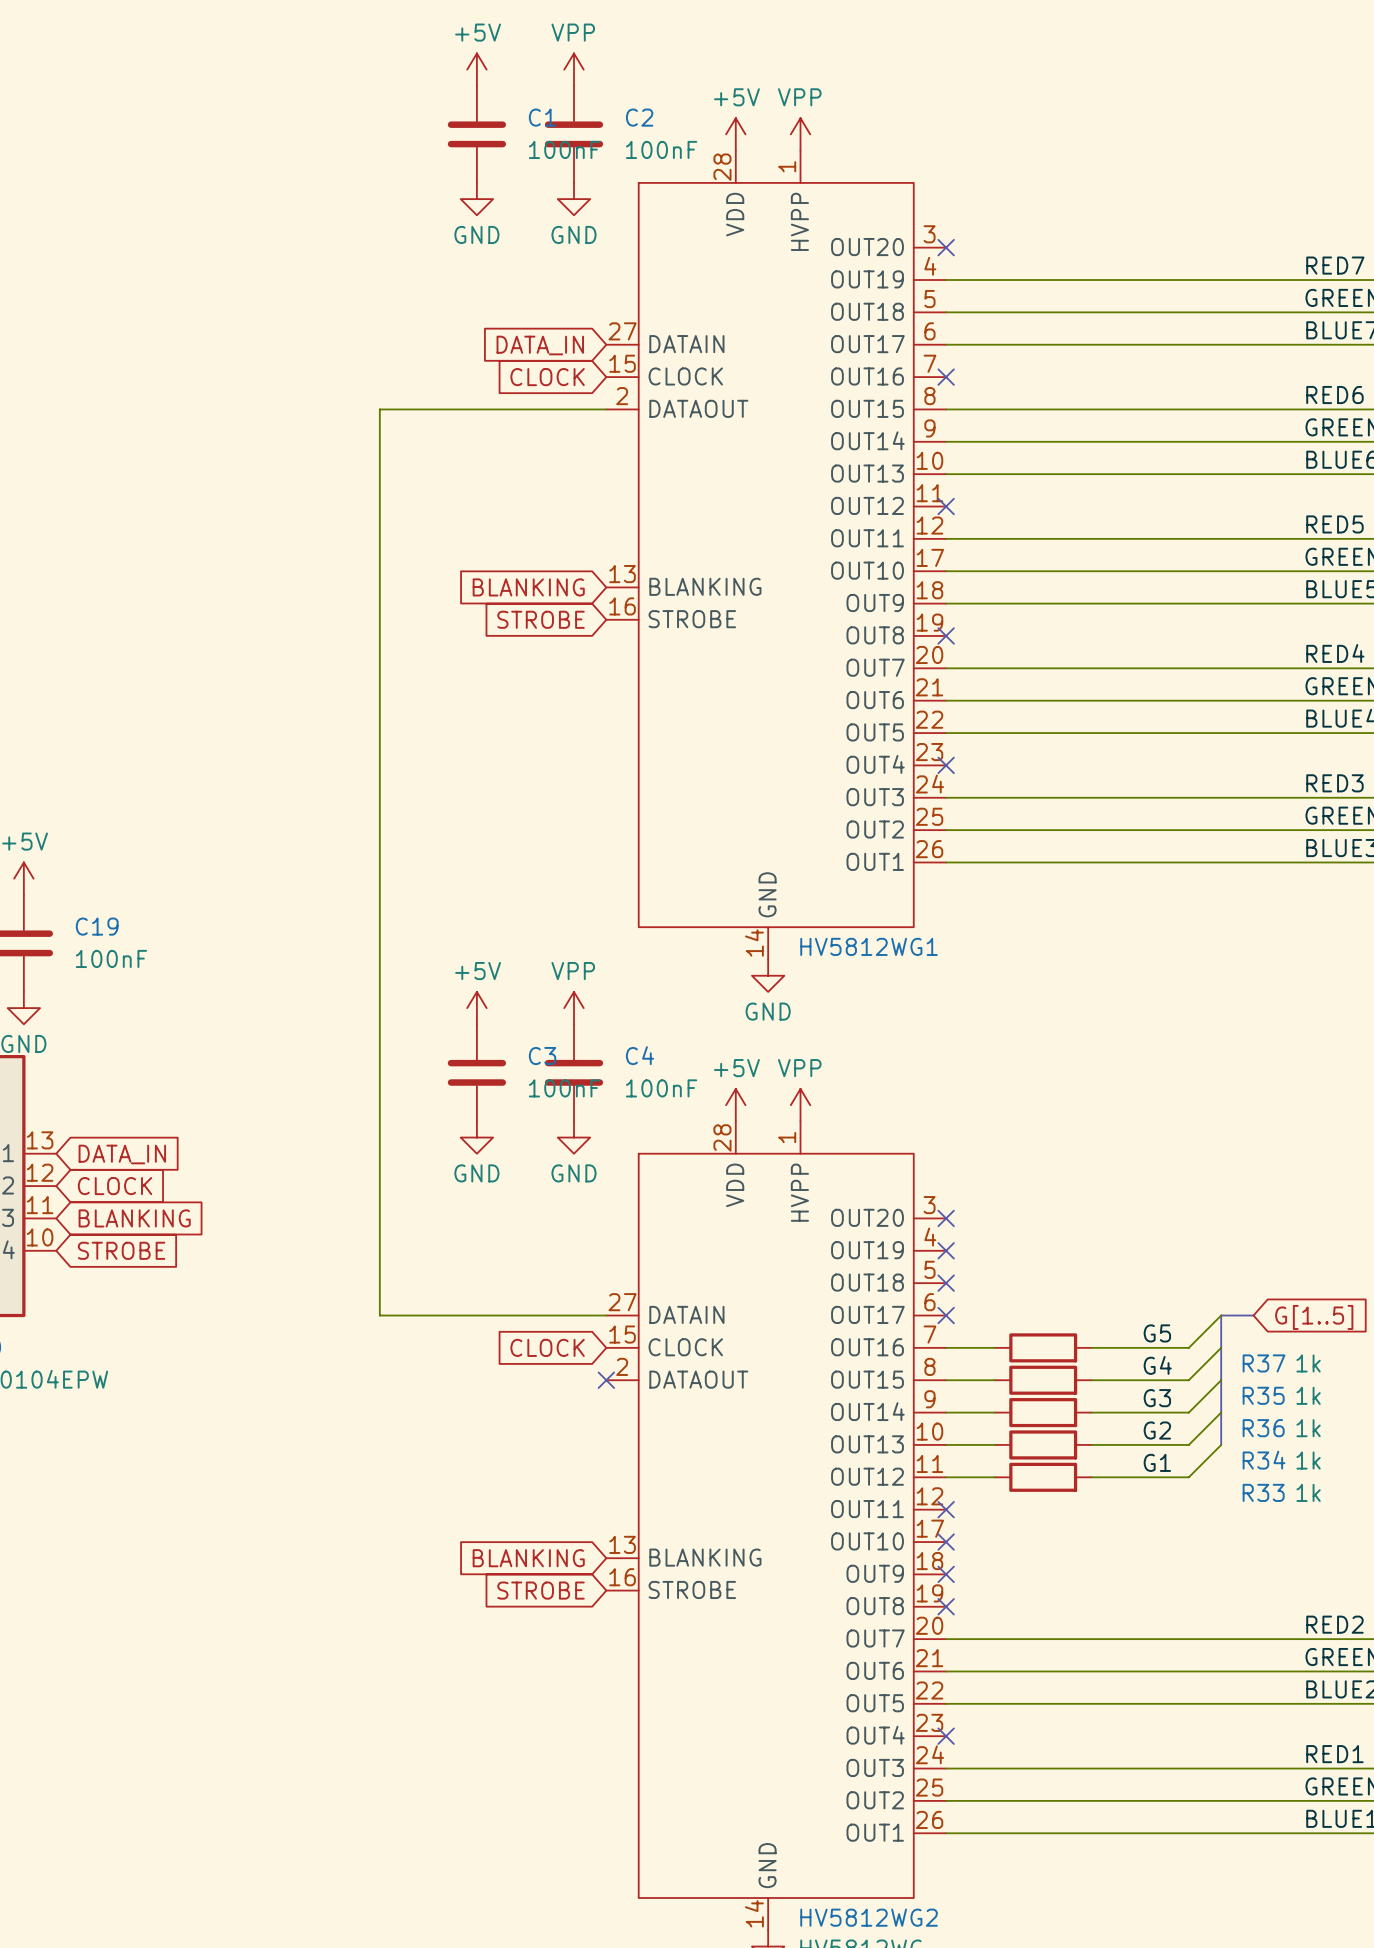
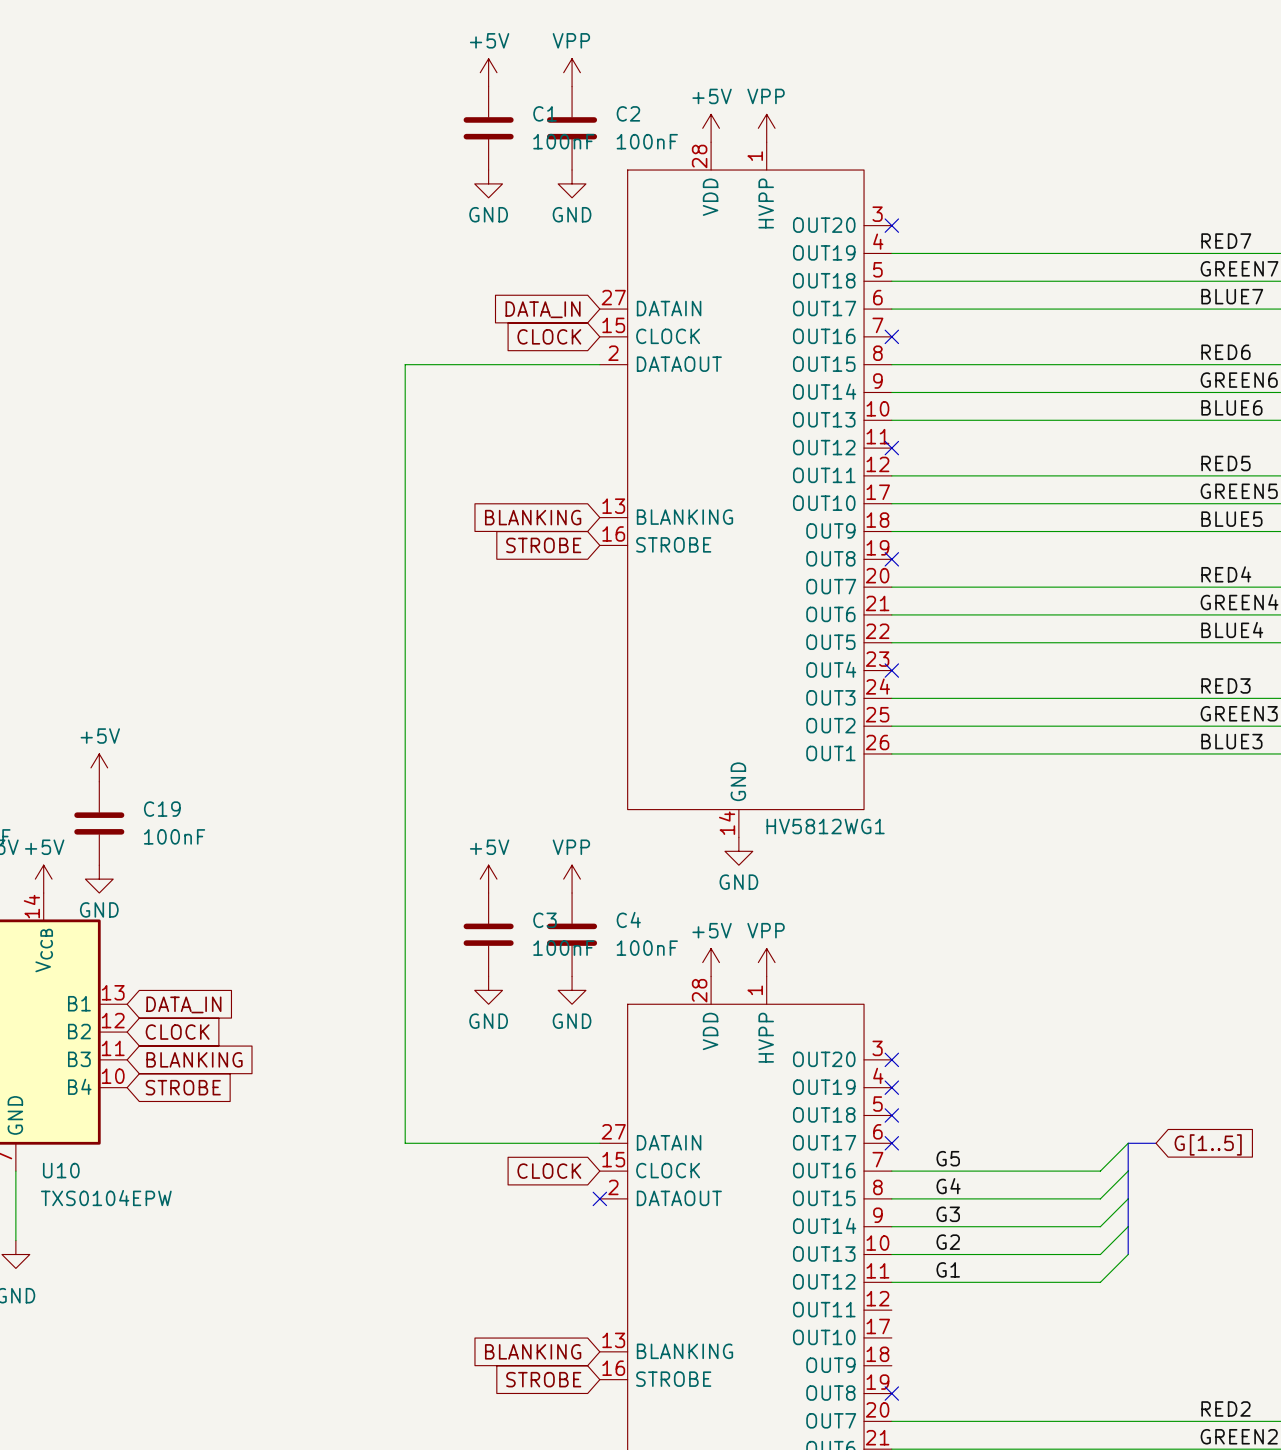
label position: G5 (1157, 1333) -> G5 (948, 1158)
wire: none -> (933, 1171) (1016, 1171)
R37: 1k (1043, 1347) -> none
label position: G4 (1157, 1365) -> G4 (948, 1186)
wire: none -> (933, 1198) (1016, 1198)
R35: 1k (1043, 1380) -> none
label position: G3 (1157, 1398) -> G3 (948, 1214)
wire: none -> (933, 1226) (1016, 1226)
R36: 1k (1043, 1412) -> none
label position: G2 (1157, 1430) -> G2 (948, 1242)
wire: none -> (933, 1254) (1016, 1254)
R34: 1k (1043, 1444) -> none
label position: G1 (1157, 1462) -> G1 (948, 1269)
wire: none -> (933, 1282) (1016, 1282)
R33: 1k (1043, 1477) -> none
no-connect mark: (946, 1509) -> none
no-connect mark: (946, 1542) -> none
no-connect mark: (946, 1574) -> none

